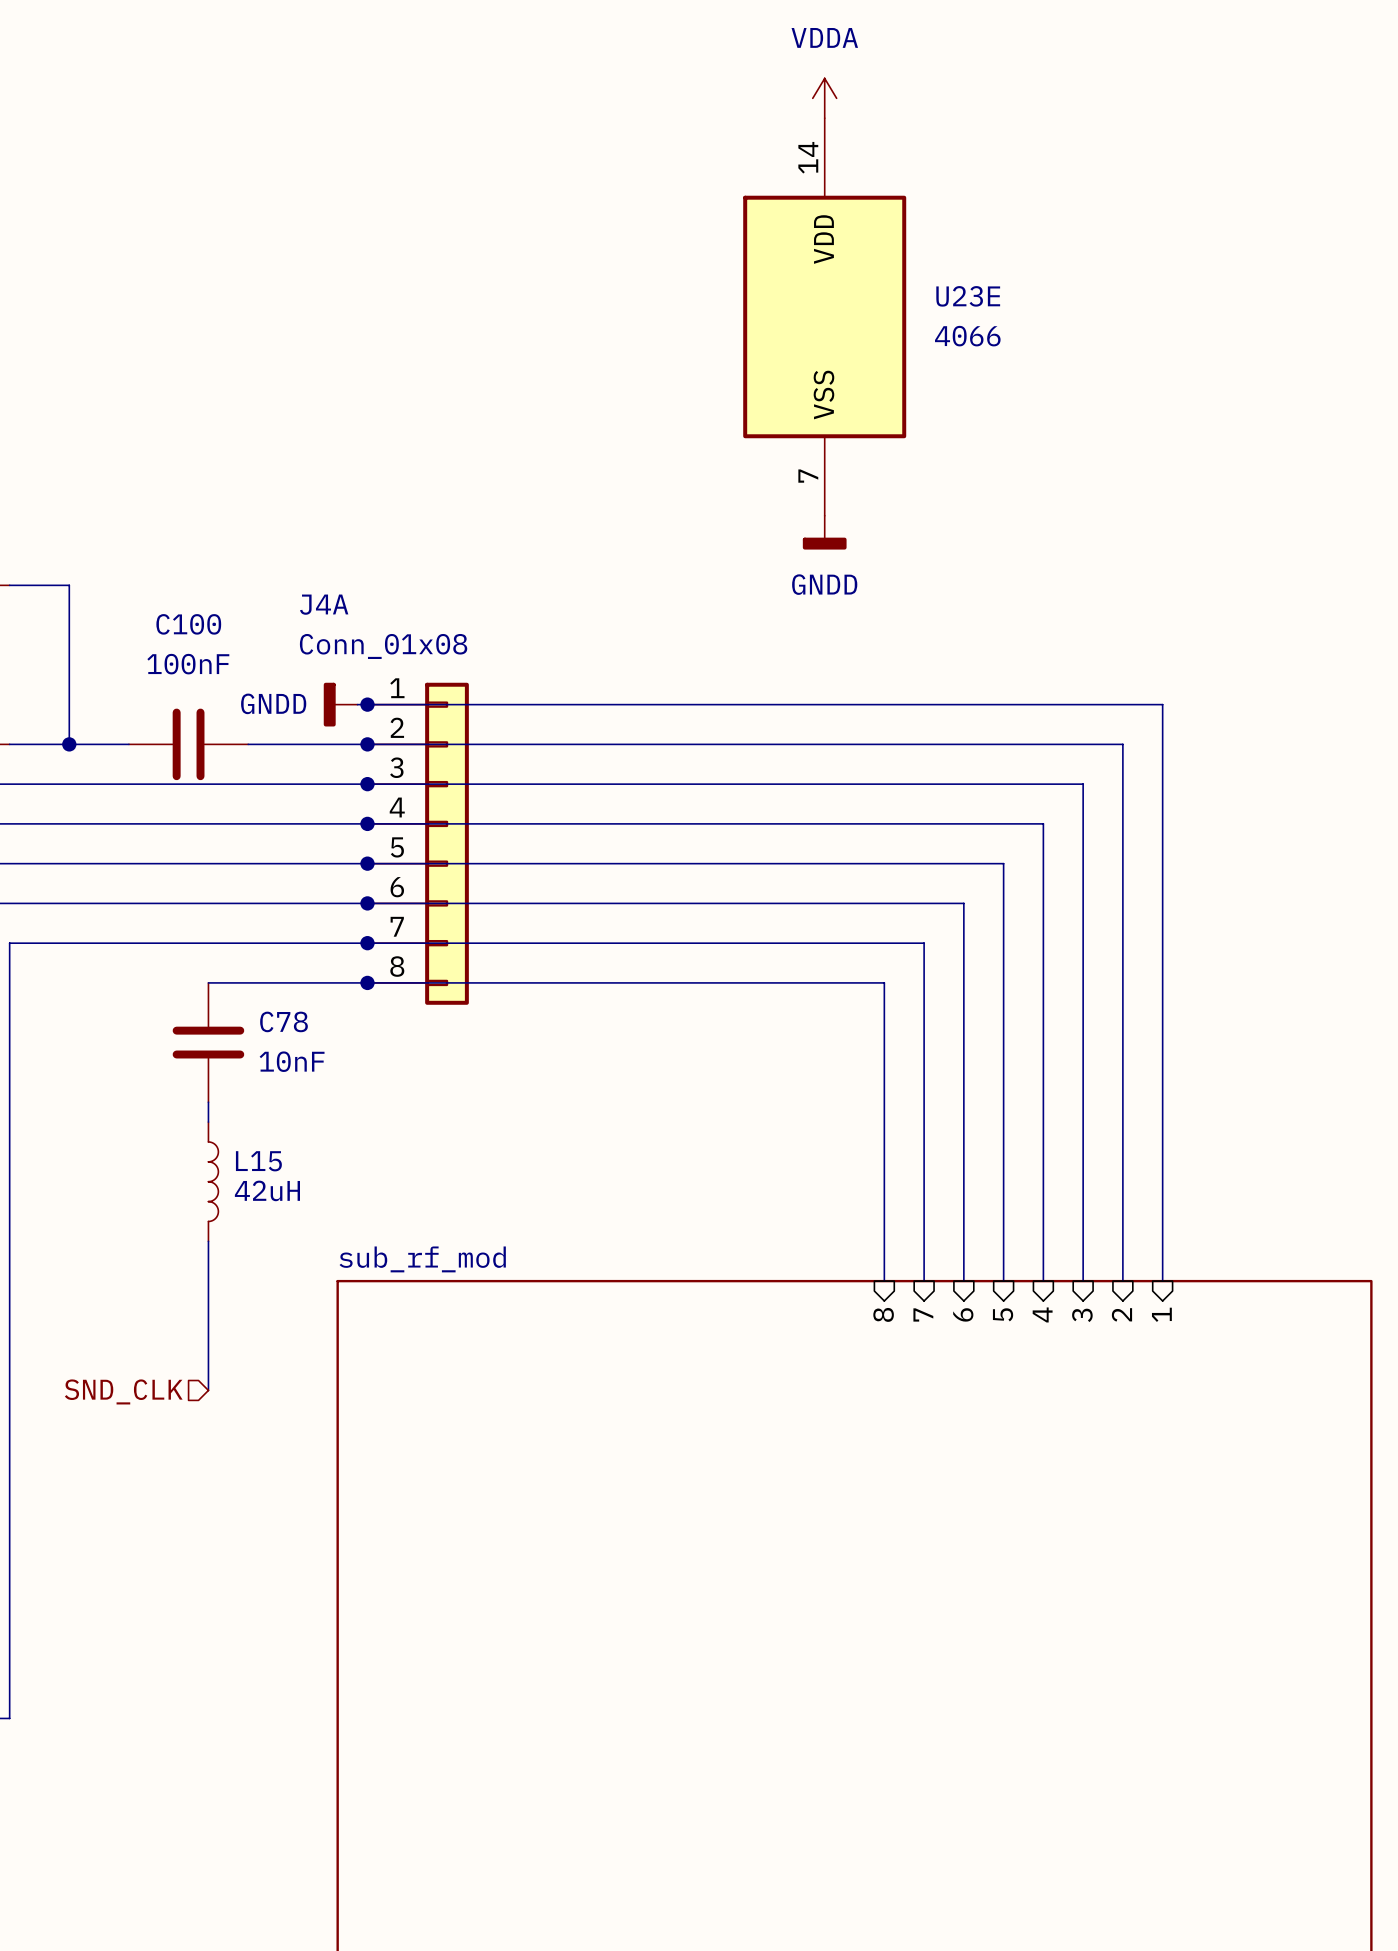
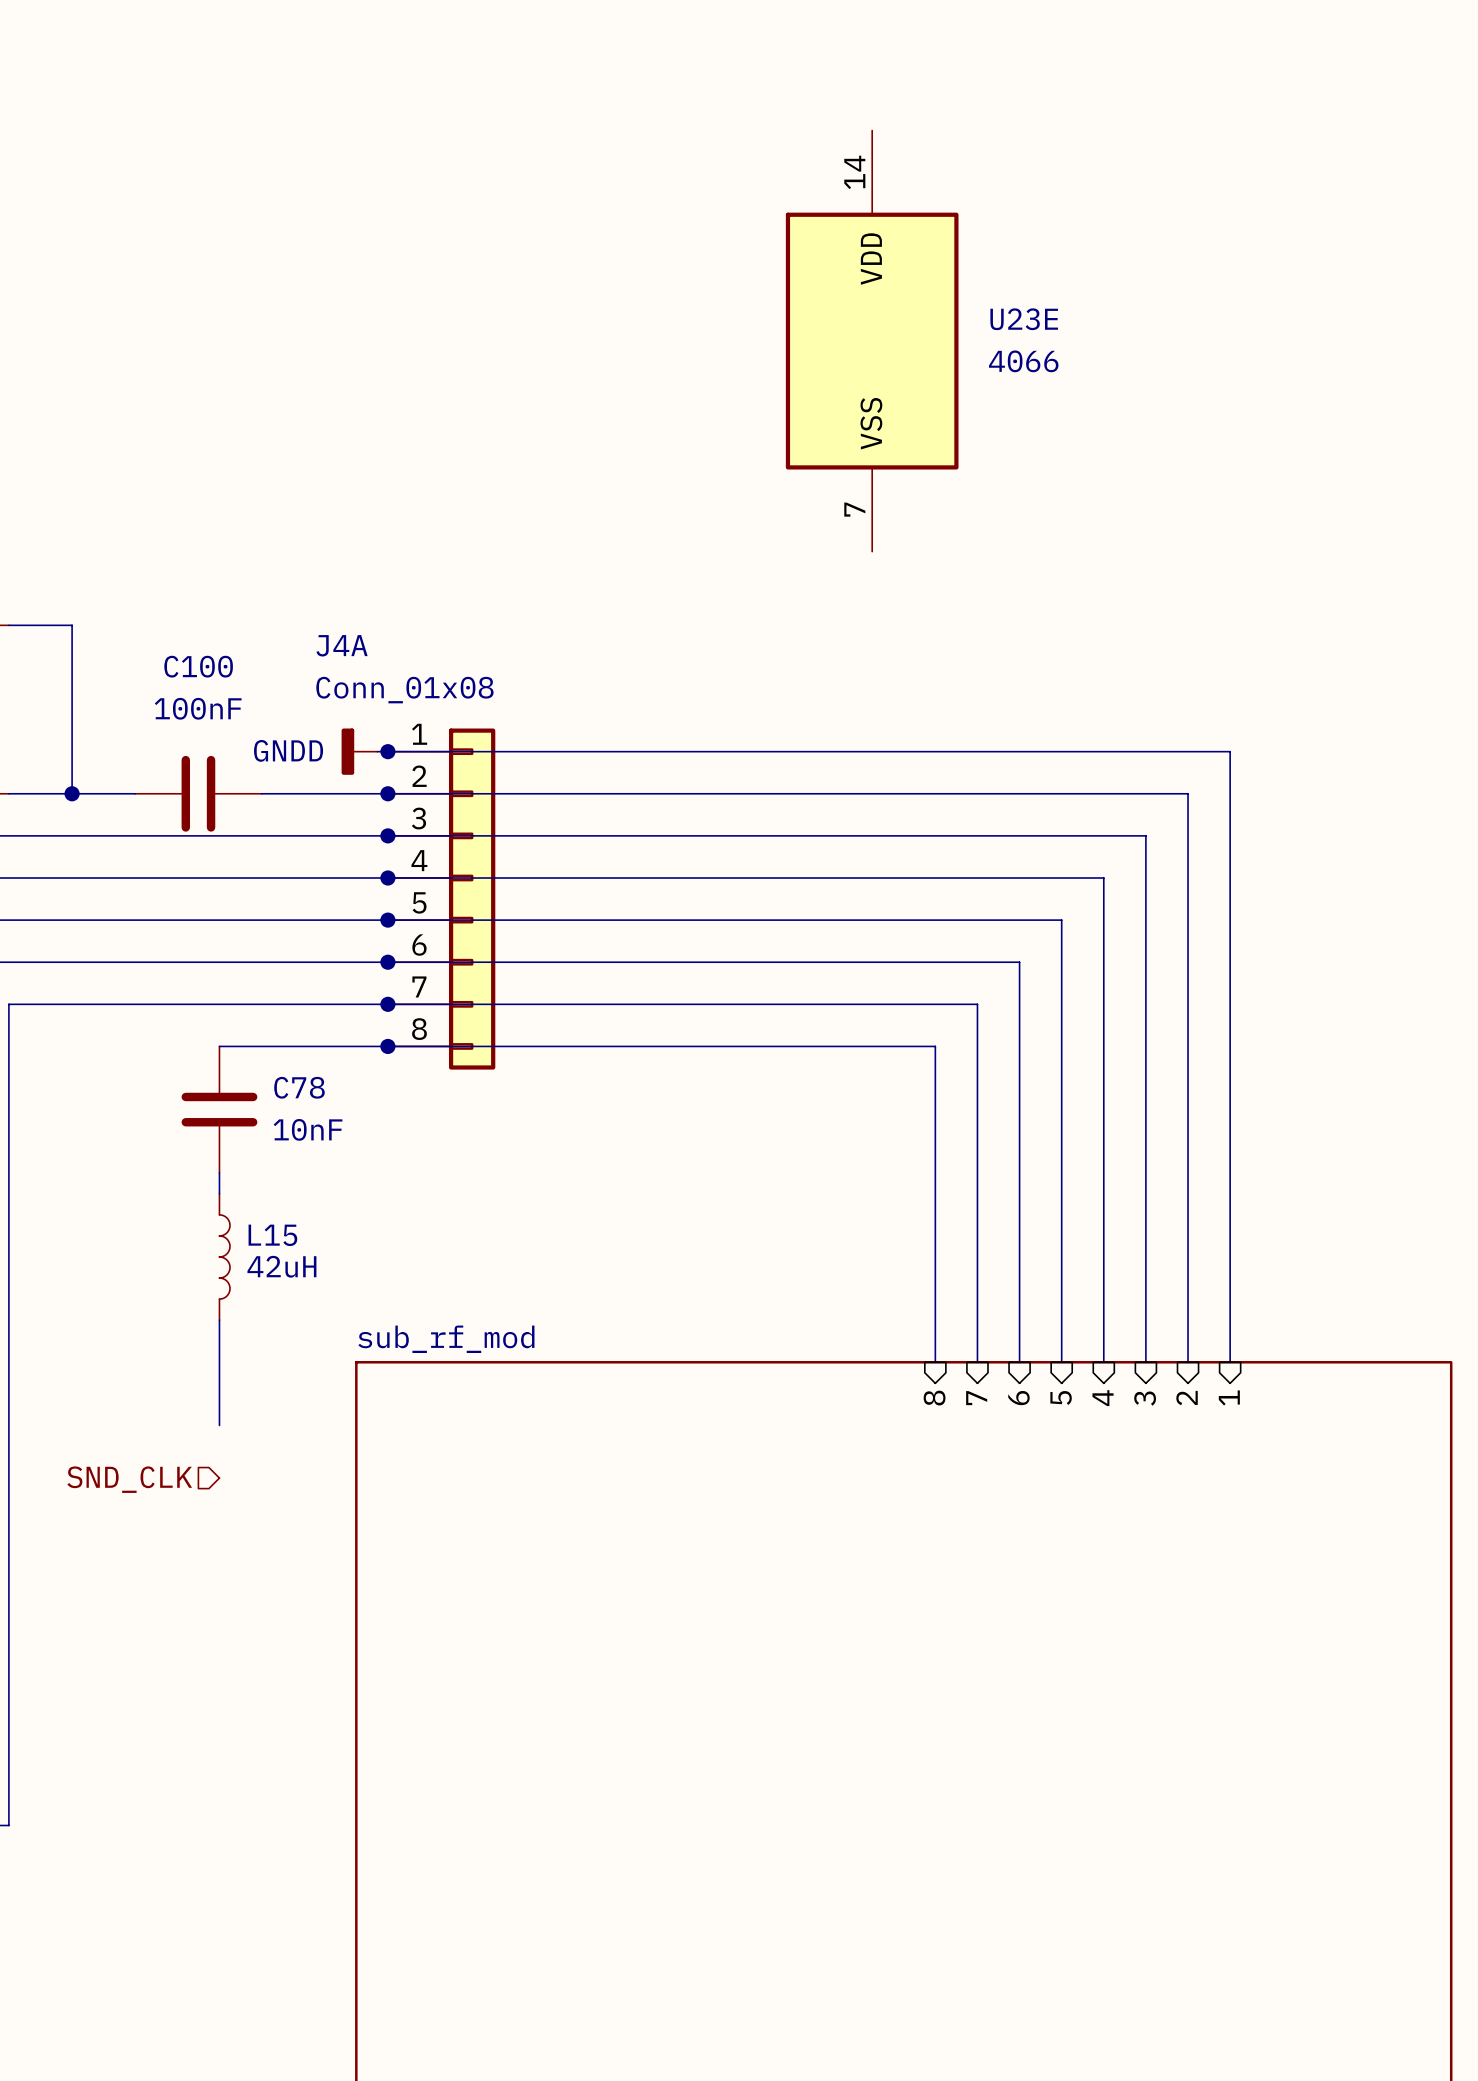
power symbol: VDDA (824, 98) -> none
power symbol: GNDD (824, 532) -> none
wire: (208, 1340) (208, 1390) -> none

